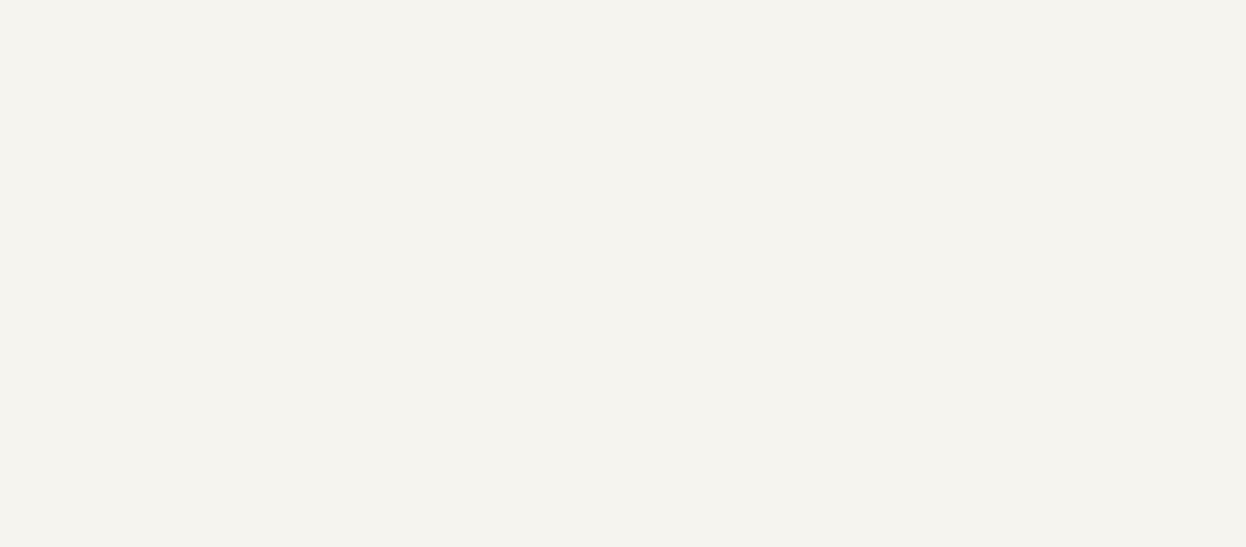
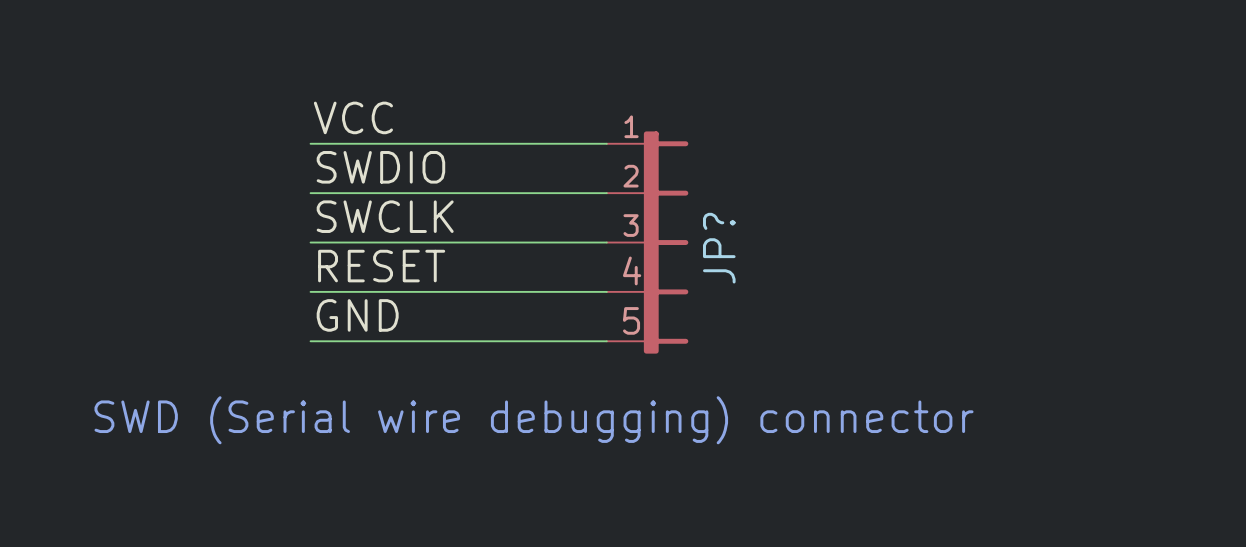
label: none -> VCC (353, 117)
wire: none -> (310, 143) (606, 143)
label: none -> SWDIO (380, 167)
wire: none -> (310, 193) (606, 193)
label: none -> SWCLK (385, 216)
wire: none -> (310, 242) (606, 242)
JP?: none -> (647, 242)
label: none -> RESET (381, 266)
wire: none -> (310, 291) (606, 291)
label: none -> GND (357, 315)
wire: none -> (310, 341) (606, 341)
text: none -> SWD (Serial wire debugging) connector (534, 420)

